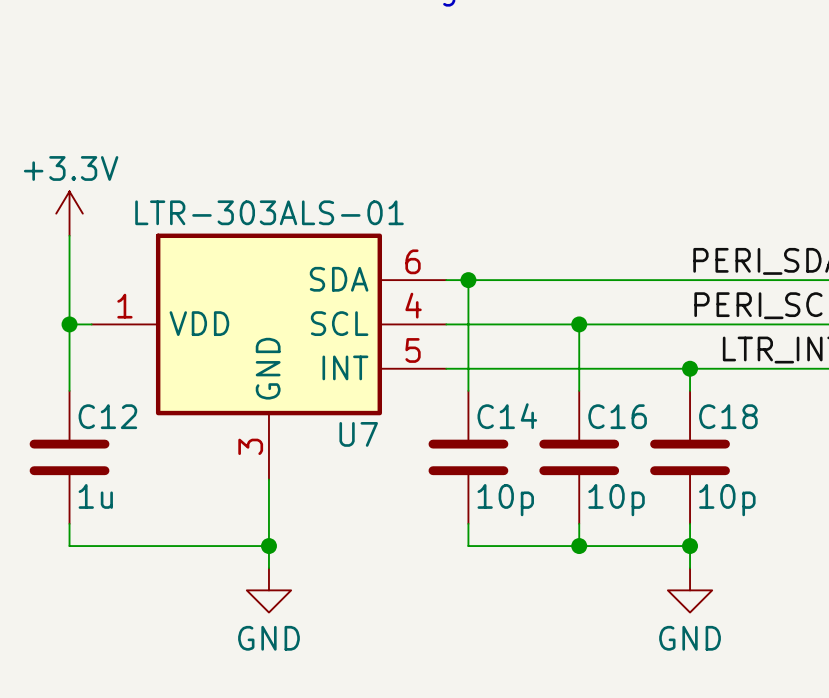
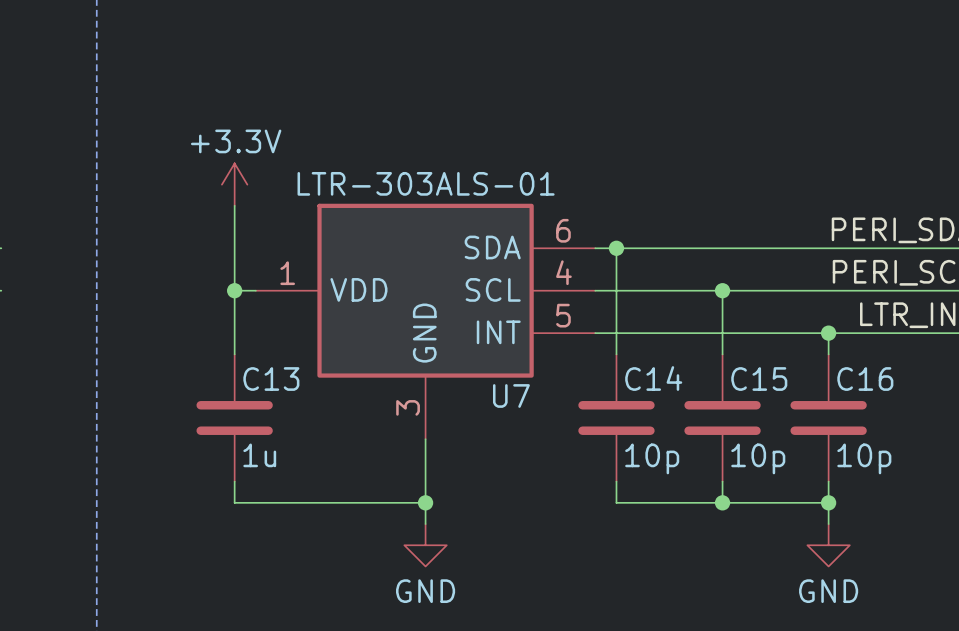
C12 name: C12 (107, 416) -> C13 (271, 379)
C16 name: C16 (617, 416) -> C15 (759, 379)
C18 name: C18 (728, 416) -> C16 (865, 379)

